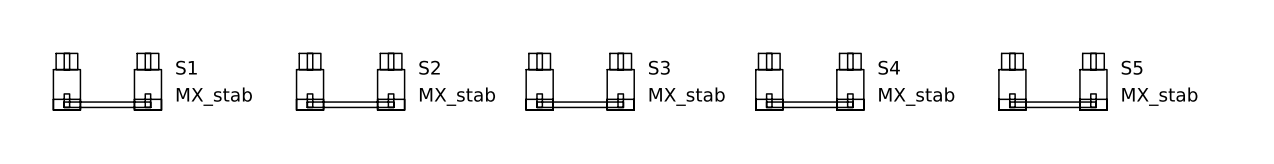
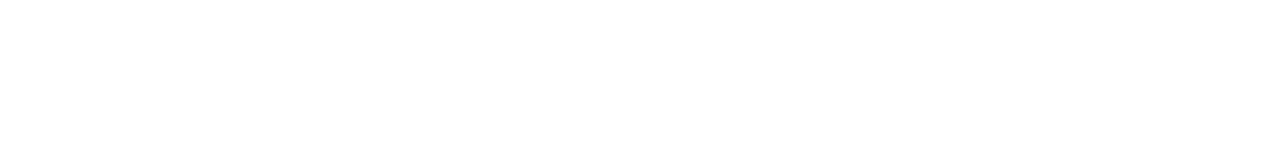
S1: MX_stab (107, 81) -> none
S2: MX_stab (350, 81) -> none
S3: MX_stab (580, 81) -> none
S4: MX_stab (809, 81) -> none
S5: MX_stab (1052, 81) -> none

